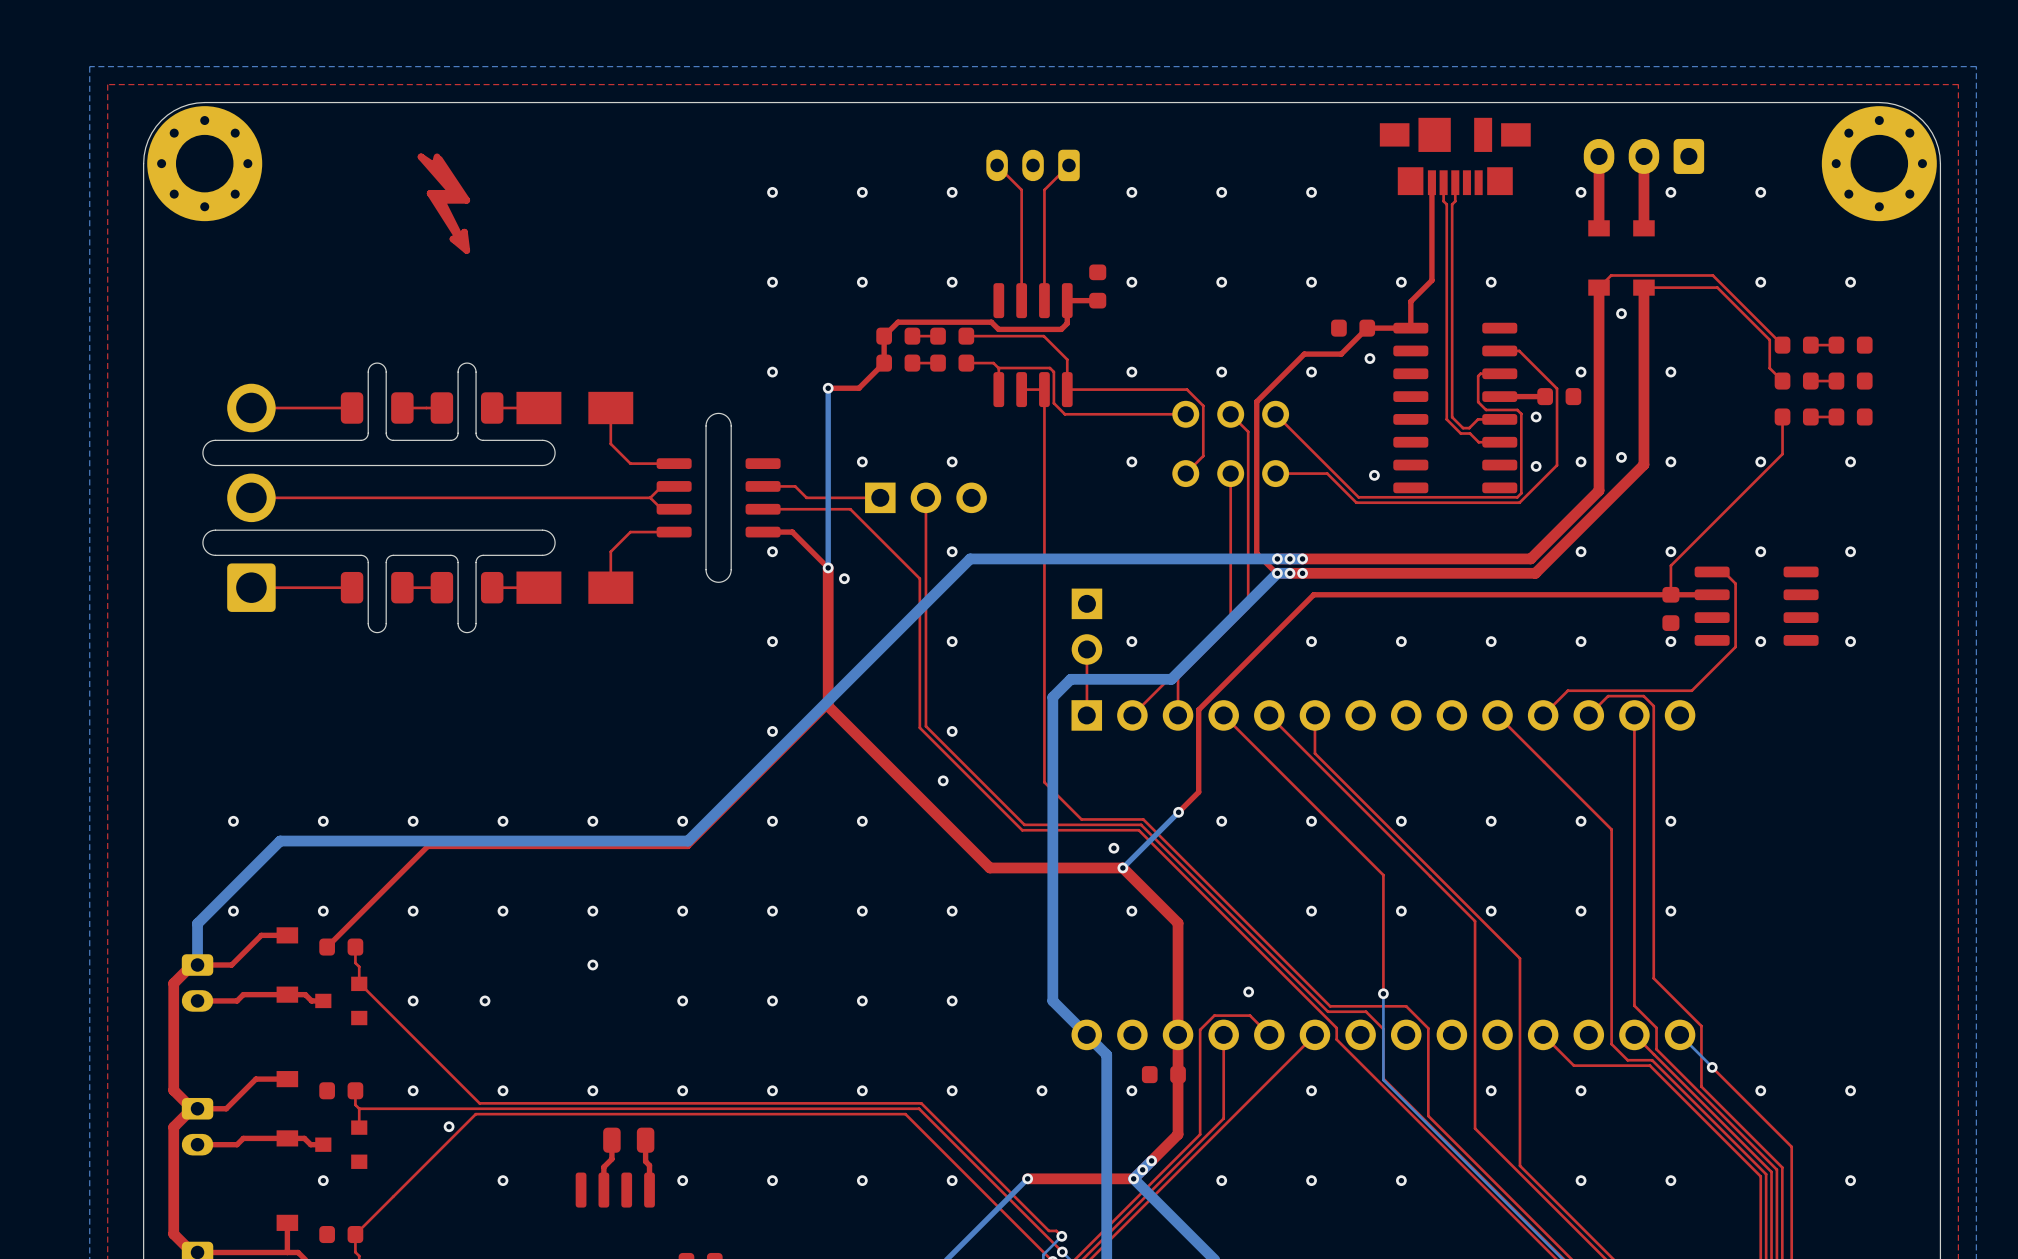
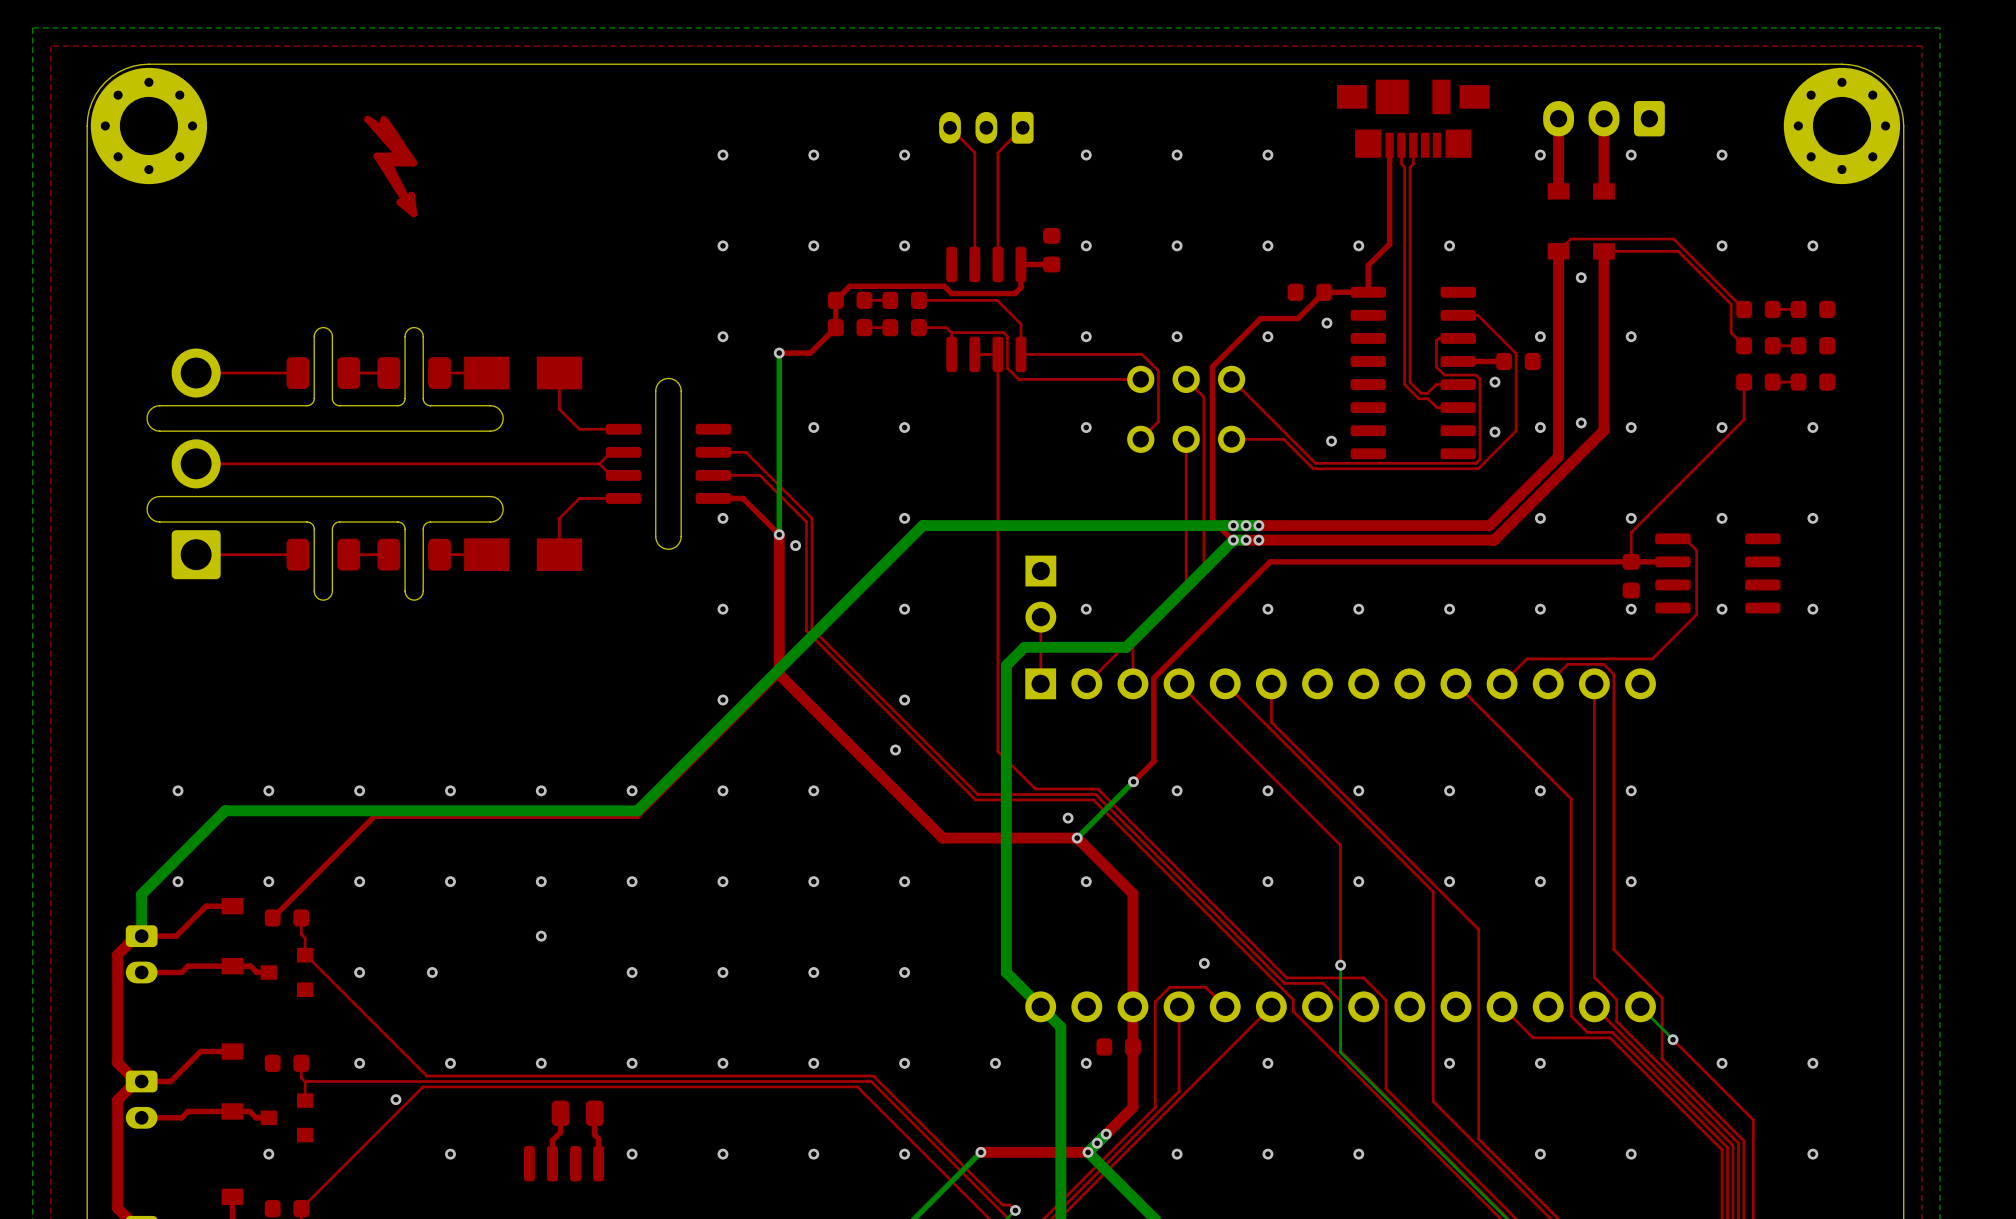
top track: (880, 497) (806, 497) -> none
top track: (925, 497) (925, 726) -> (757, 463) (811, 518) (811, 628) (878, 694)
part: (925, 497) -> none
top track: (809, 509) (850, 509) (919, 578) (919, 727) -> (759, 475) (806, 521) (806, 630) (871, 696)

